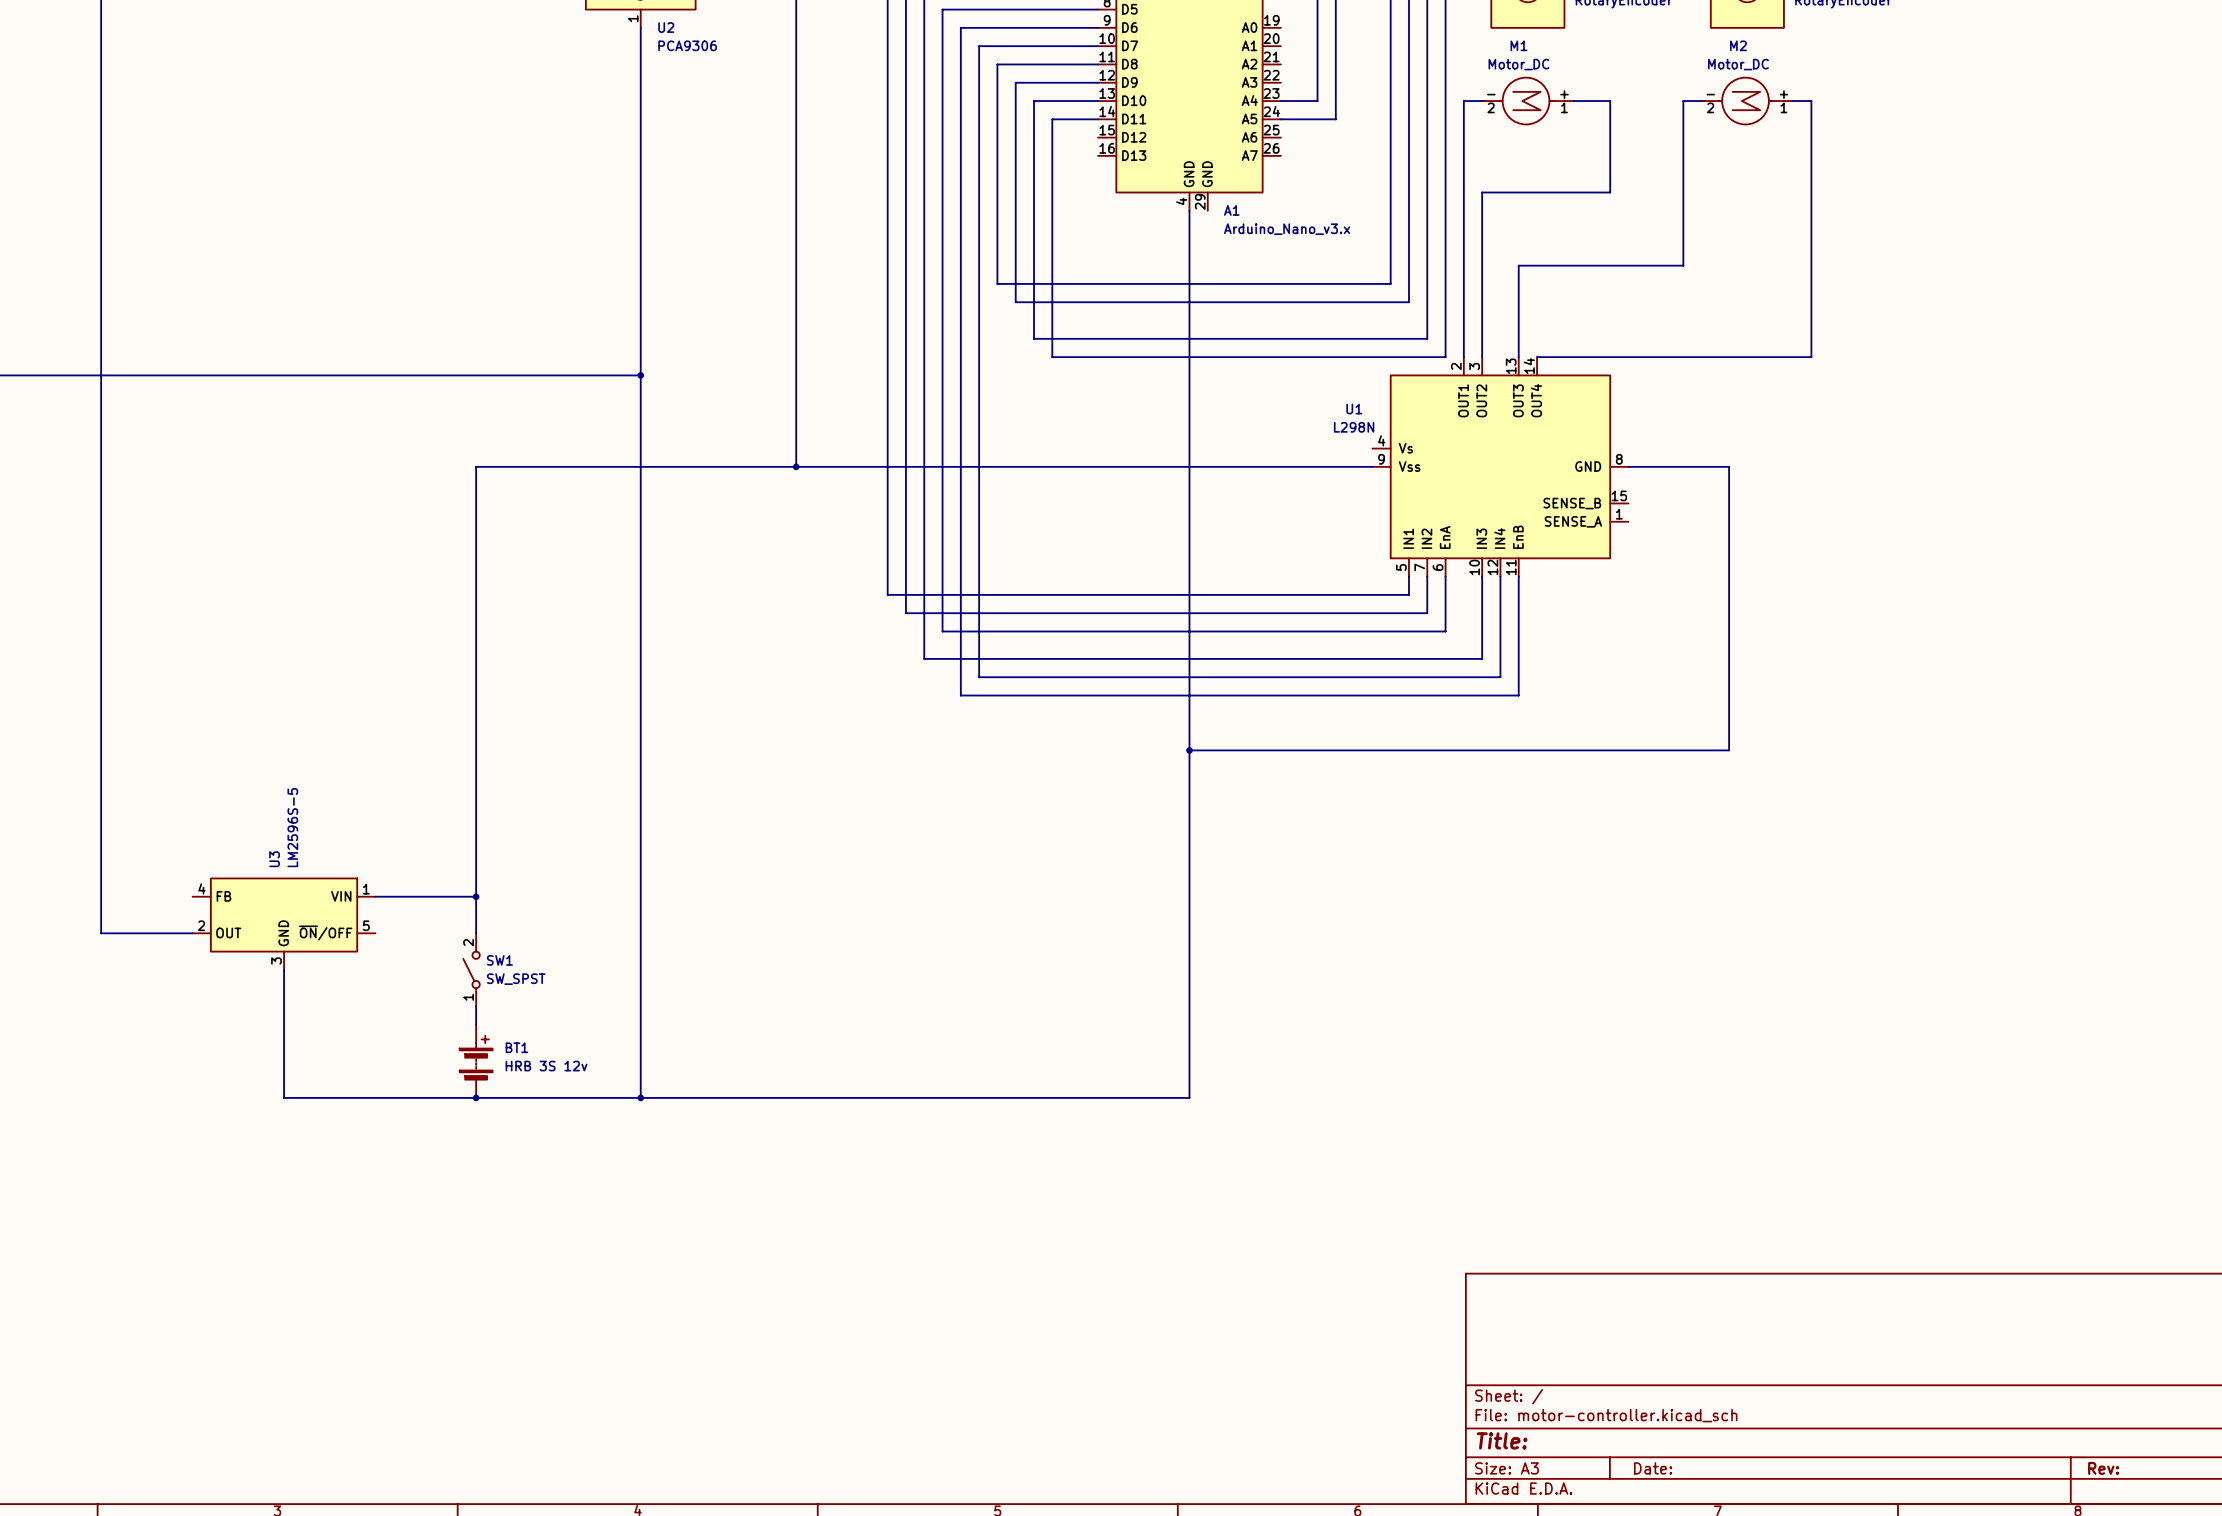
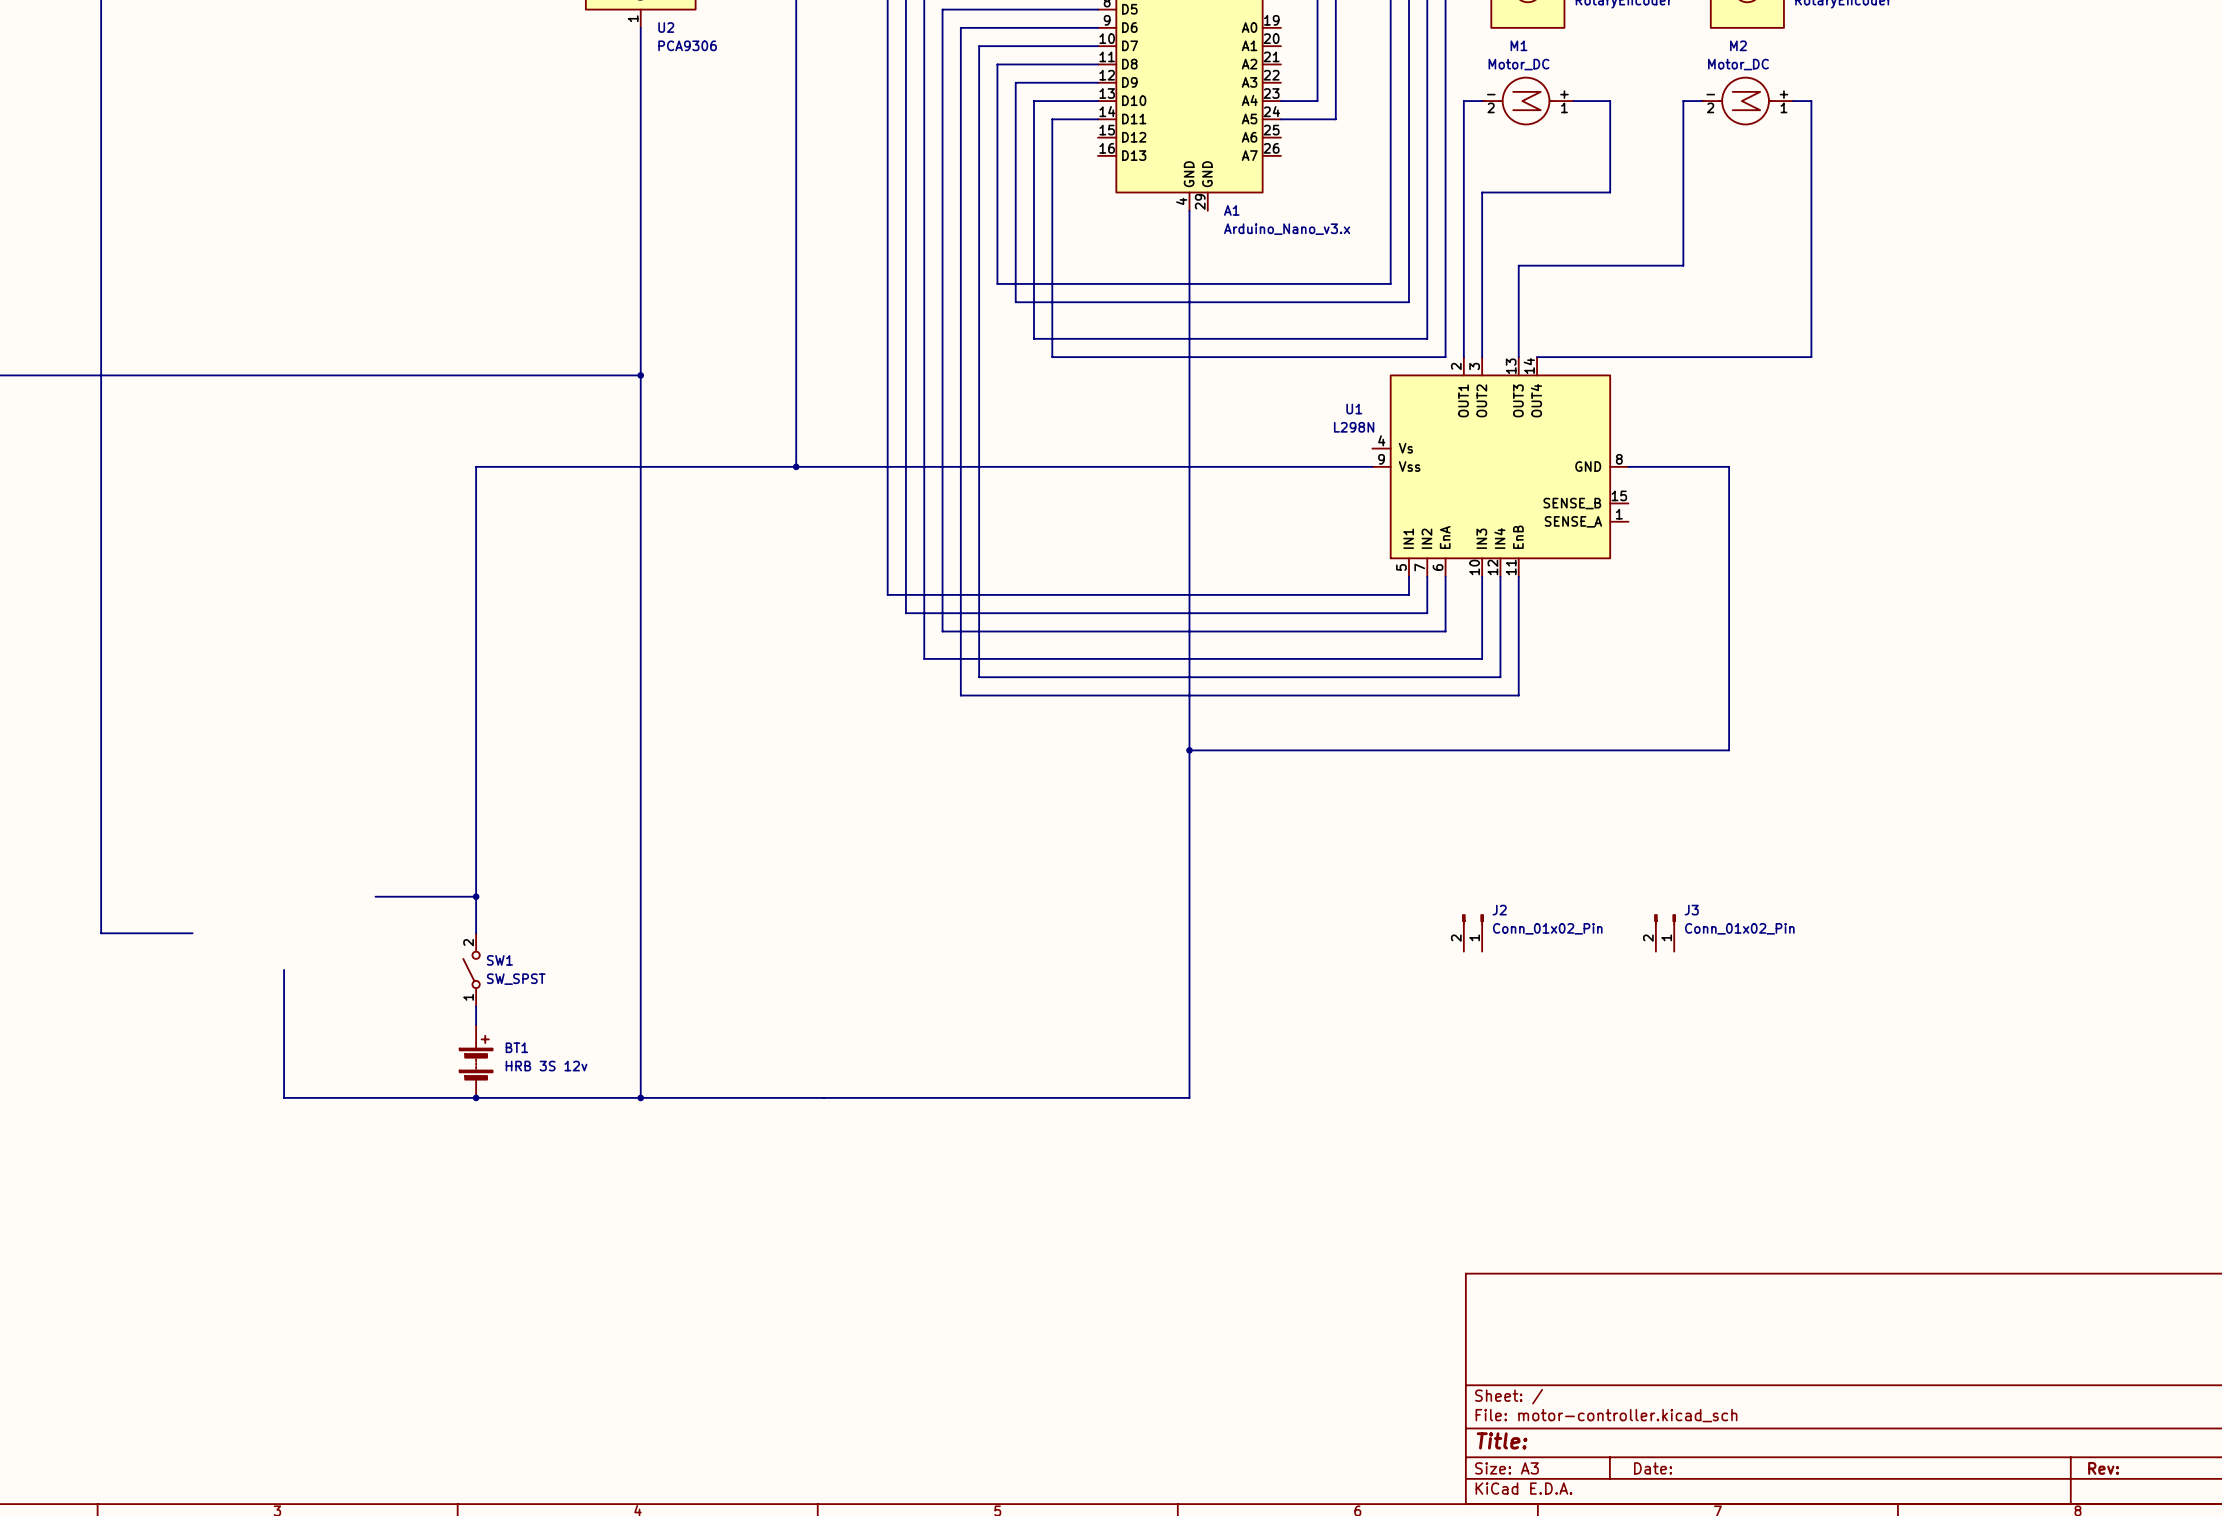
U3: LM2596S-5 (284, 923) -> none
J2: none -> Conn_01x02_Pin (1473, 933)
J3: none -> Conn_01x02_Pin (1665, 933)

